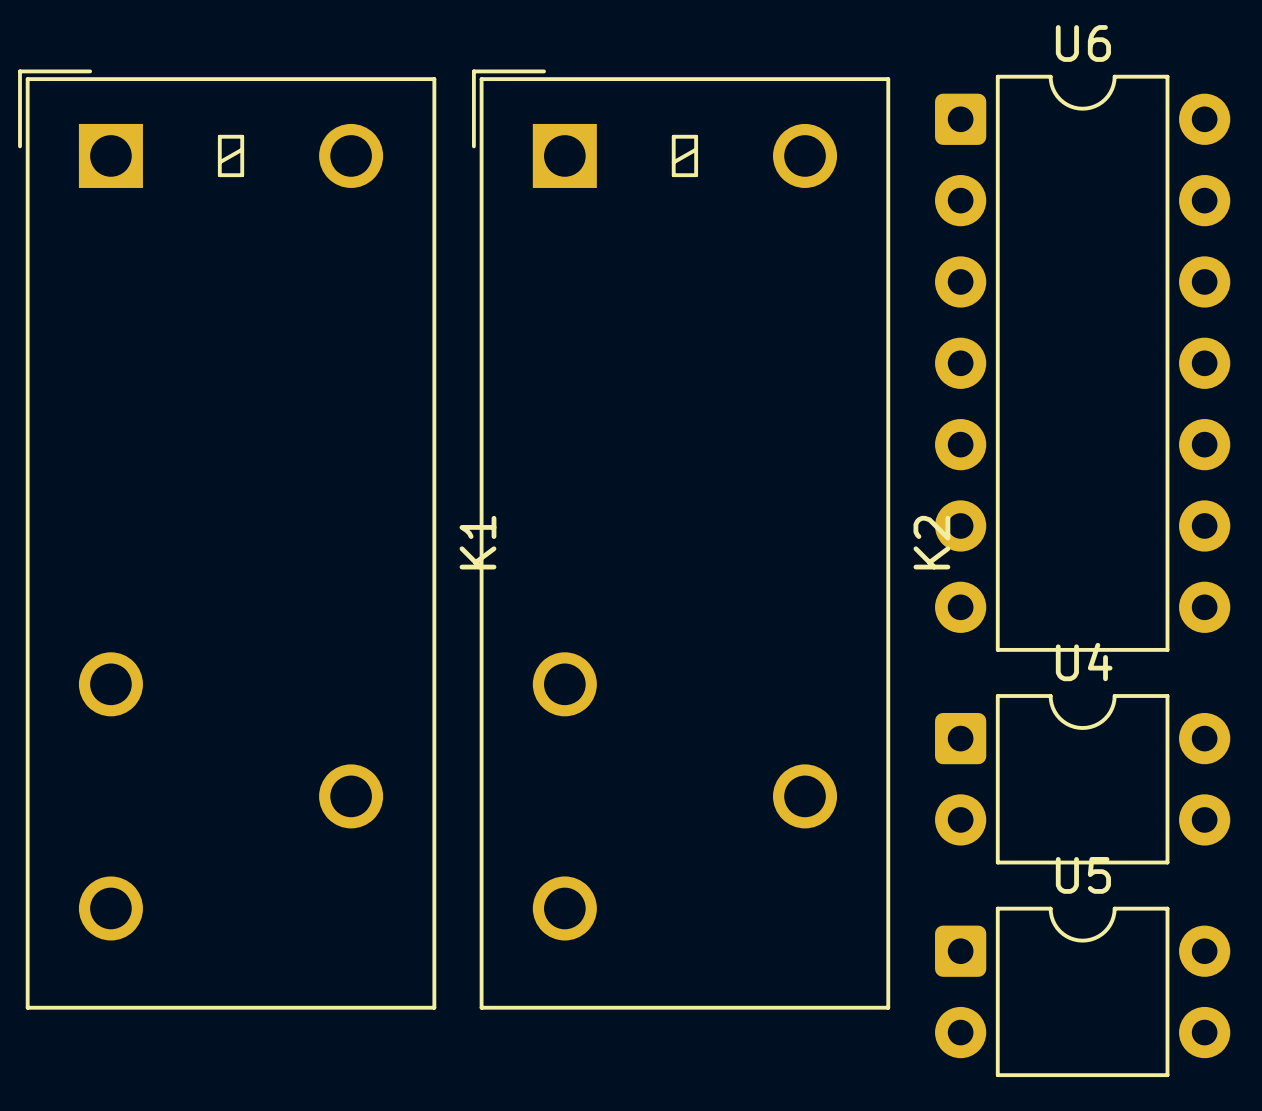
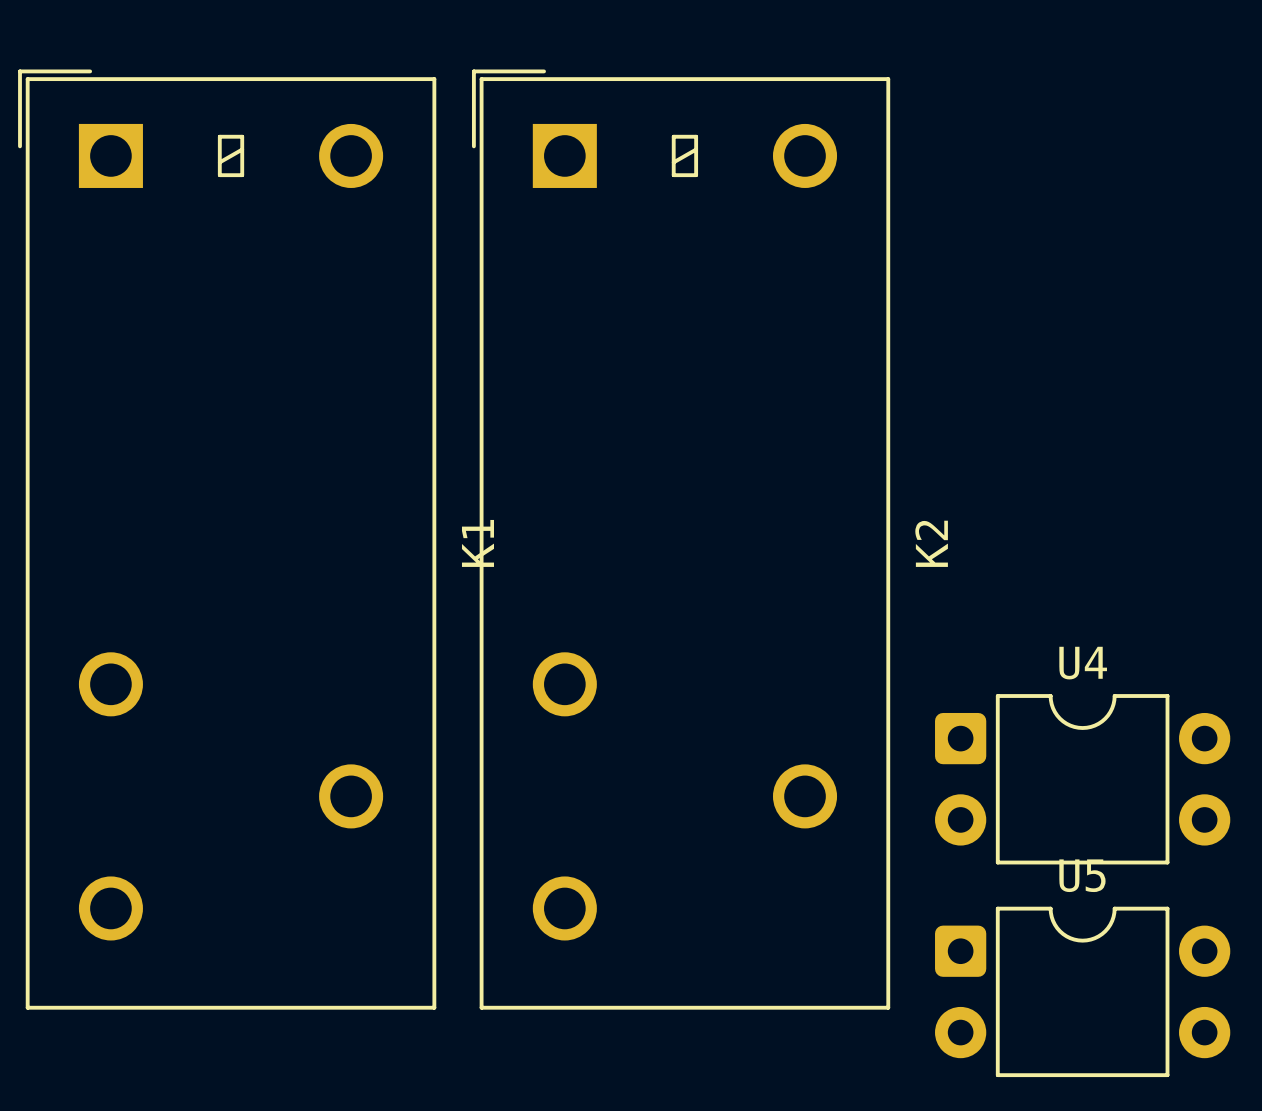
U6: (1082, 363) -> none

